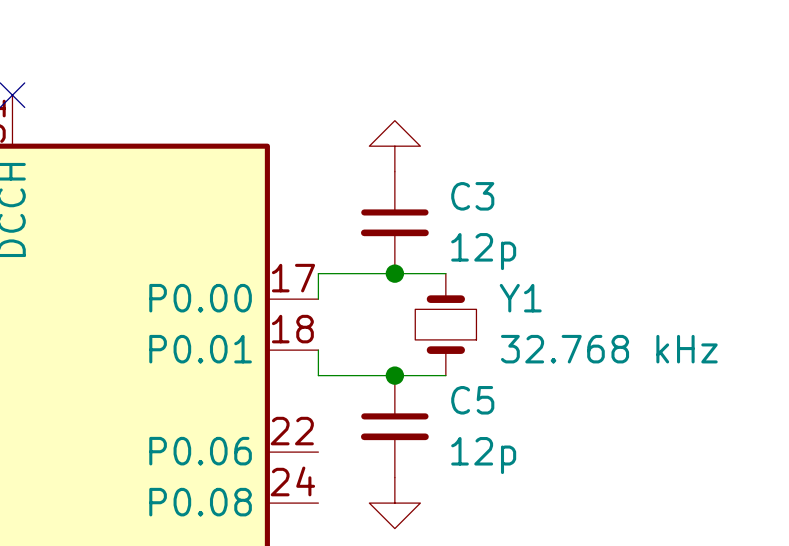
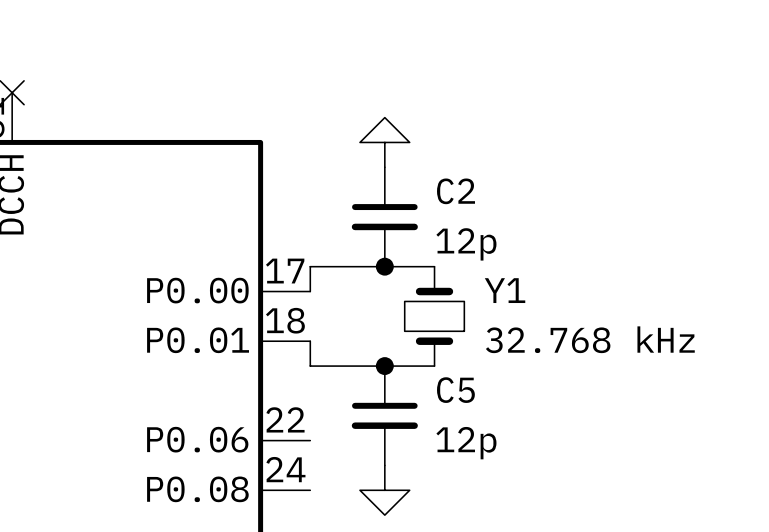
C3 name: C3 (472, 196) -> C2 (456, 191)

